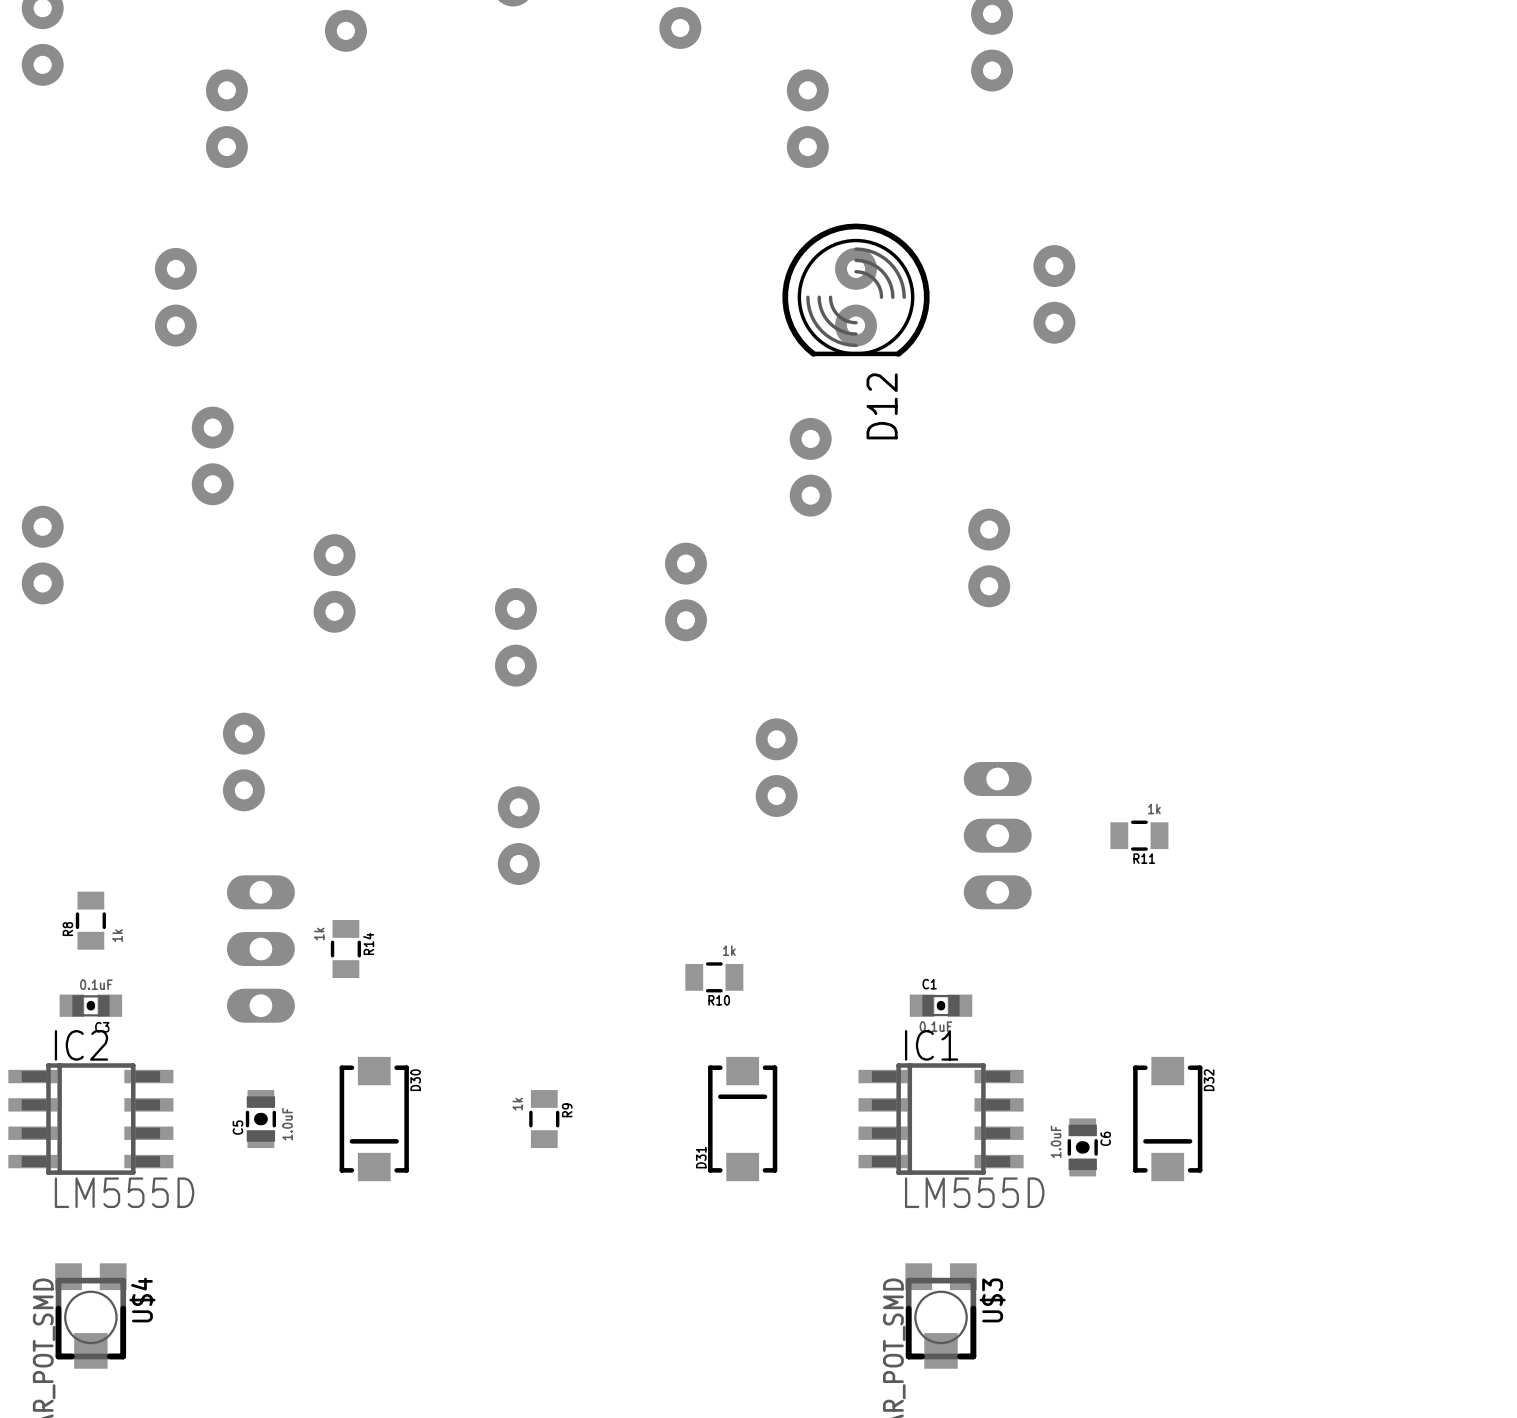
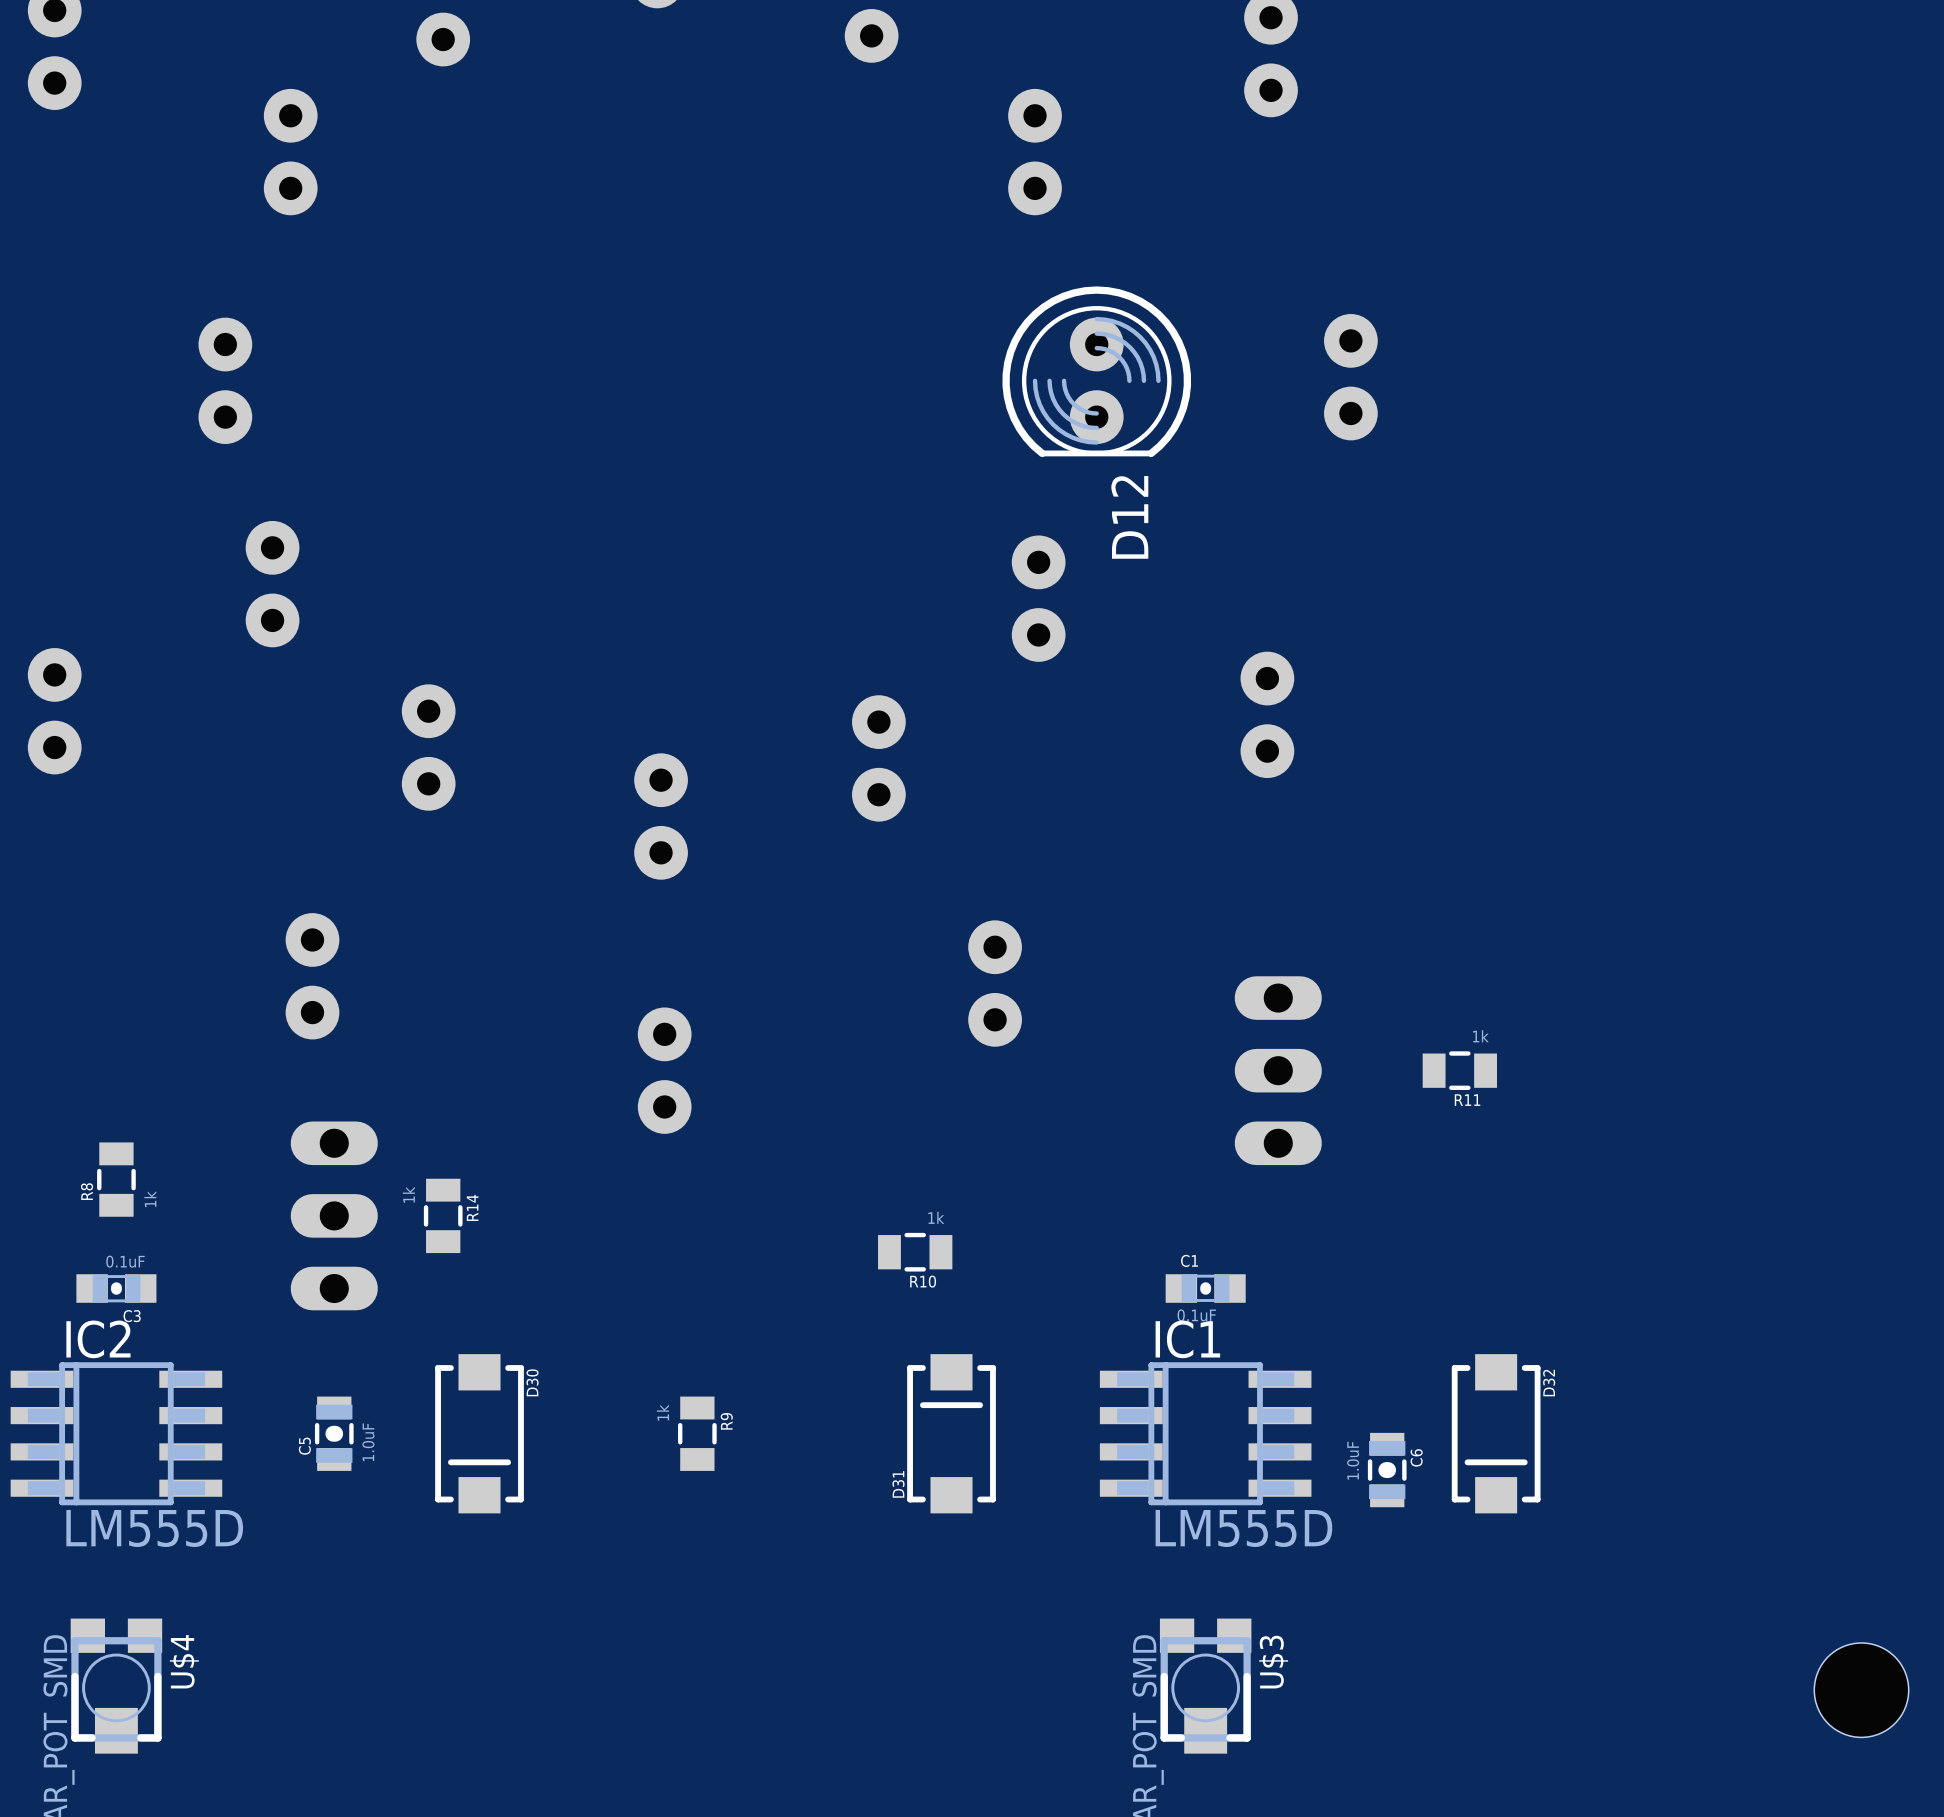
part: none -> (1861, 1690)

